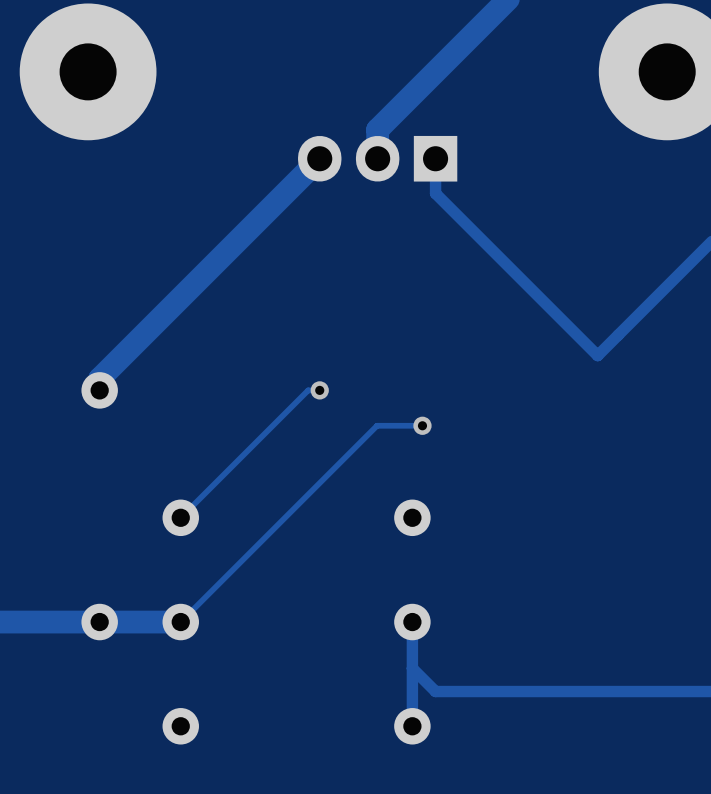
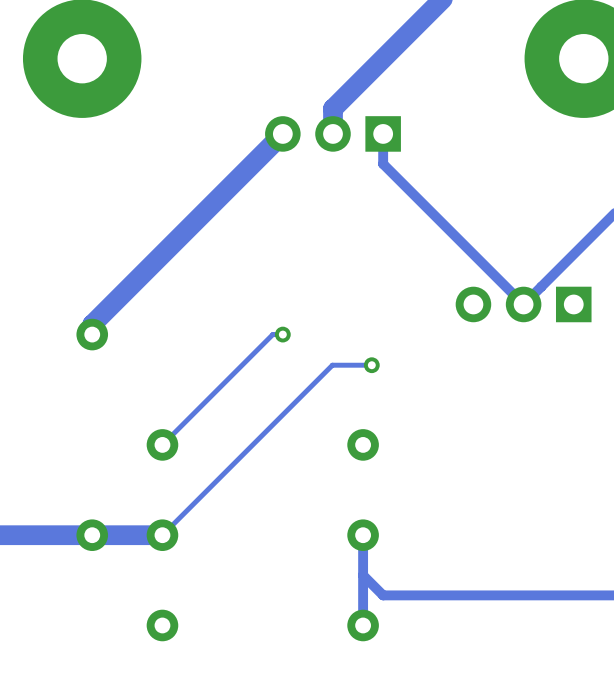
part footprint: [298, 135, 458, 182] -> [265, 116, 401, 152]
part: none -> (523, 304)

